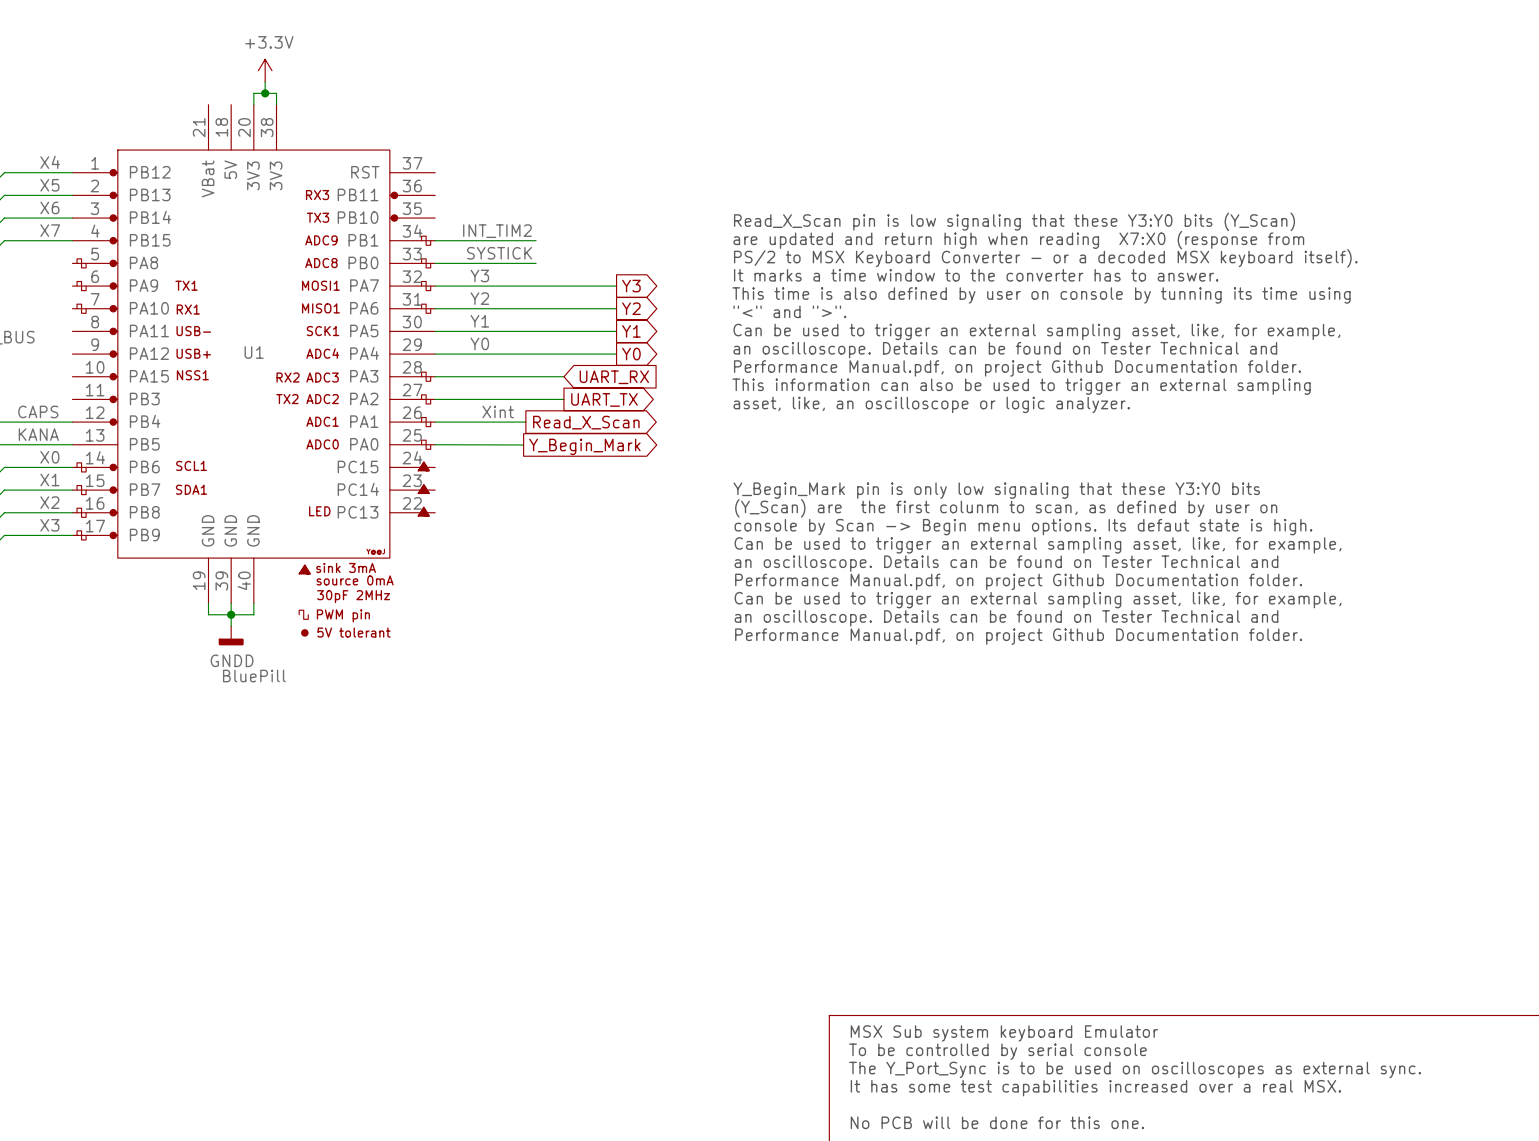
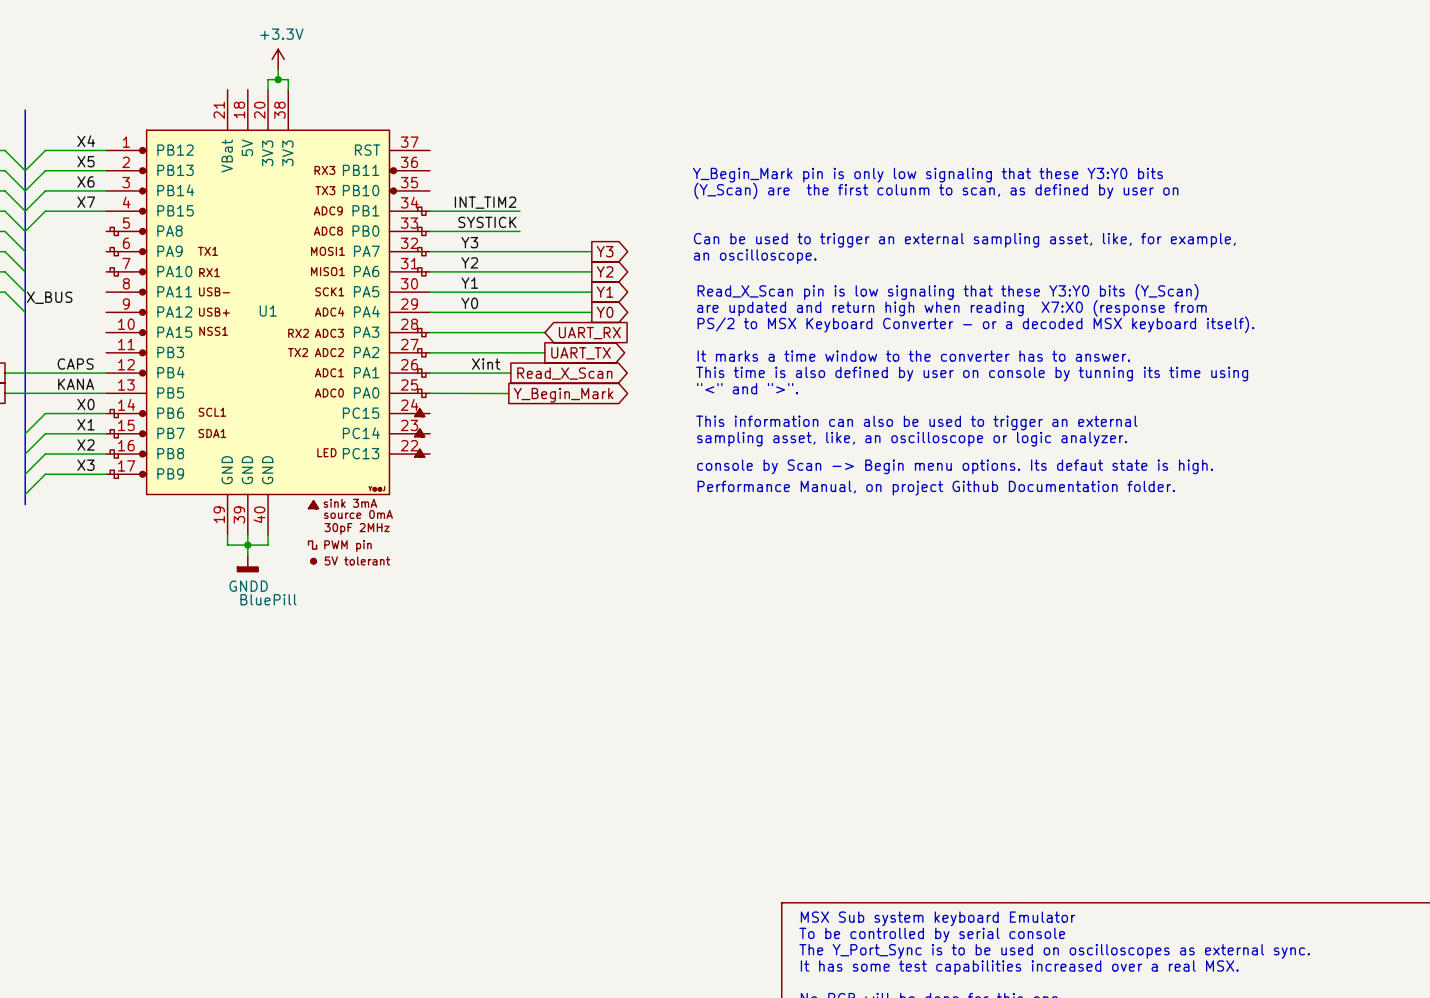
text: none -> Y_Begin_Mark pin is only low signaling that these Y3:Y0 bits (927, 175)
text: none -> (Y_Scan) are the first colunm to scan, as defined by user on (936, 190)
text position: Read_X_Scan pin is low signaling that these Y3:Y0 bits (Y_Scan) (1014, 221) -> Read_X_Scan pin is low signaling that these Y3:Y0 bits (Y_Scan) (948, 292)
text position: are updated and return high when reading X7:X0 (response from (1018, 240) -> are updated and return high when reading X7:X0 (response from (951, 308)
text position: PS/2 to MSX Keyboard Converter - or a decoded MSX keyboard itself). (1045, 258) -> PS/2 to MSX Keyboard Converter - or a decoded MSX keyboard itself). (975, 324)
text position: It marks a time window to the converter has to answer. (976, 275) -> It marks a time window to the converter has to answer. (913, 356)
text: none -> an oscilloscope. (755, 256)
text position: This time is also defined by user on console by tunning its time using (1041, 295) -> This time is also defined by user on console by tunning its time using (972, 374)
text position: "<" and ">". (789, 311) -> "<" and ">". (747, 388)
text position: Can be used to trigger an external sampling asset, like, for example, (1036, 331) -> Can be used to trigger an external sampling asset, like, for example, (964, 240)
text: an oscilloscope. Details can be found on Tester Technical and (1005, 350) -> none
text: Performance Manual.pdf, on project Github Documentation folder. (1017, 368) -> none
text: This information can also be used to trigger an external sampling (1021, 386) -> none
text: asset, like, an oscilloscope or logic analyzer. (931, 404) -> none
text: none -> This information can also be used to trigger an external (916, 422)
text: Y_Begin_Mark pin is only low signaling that these Y3:Y0 bits (996, 490) -> sampling asset, like, an oscilloscope or logic analyzer. (912, 439)
text: (Y_Scan) are the first colunm to scan, as defined by user on (1006, 508) -> none
text: Can be used to trigger an external sampling asset, like, for example, (1038, 545) -> Performance Manual, on project Github Documentation folder. (936, 488)
text: an oscilloscope. Details can be found on Tester Technical and (1006, 563) -> none
text: Performance Manual.pdf, on project Github Documentation folder. (1018, 581) -> none
text: Can be used to trigger an external sampling asset, like, for example, (1038, 600) -> none
text: an oscilloscope. Details can be found on Tester Technical and (1006, 618) -> none
text: Performance Manual.pdf, on project Github Documentation folder. (1018, 636) -> none

